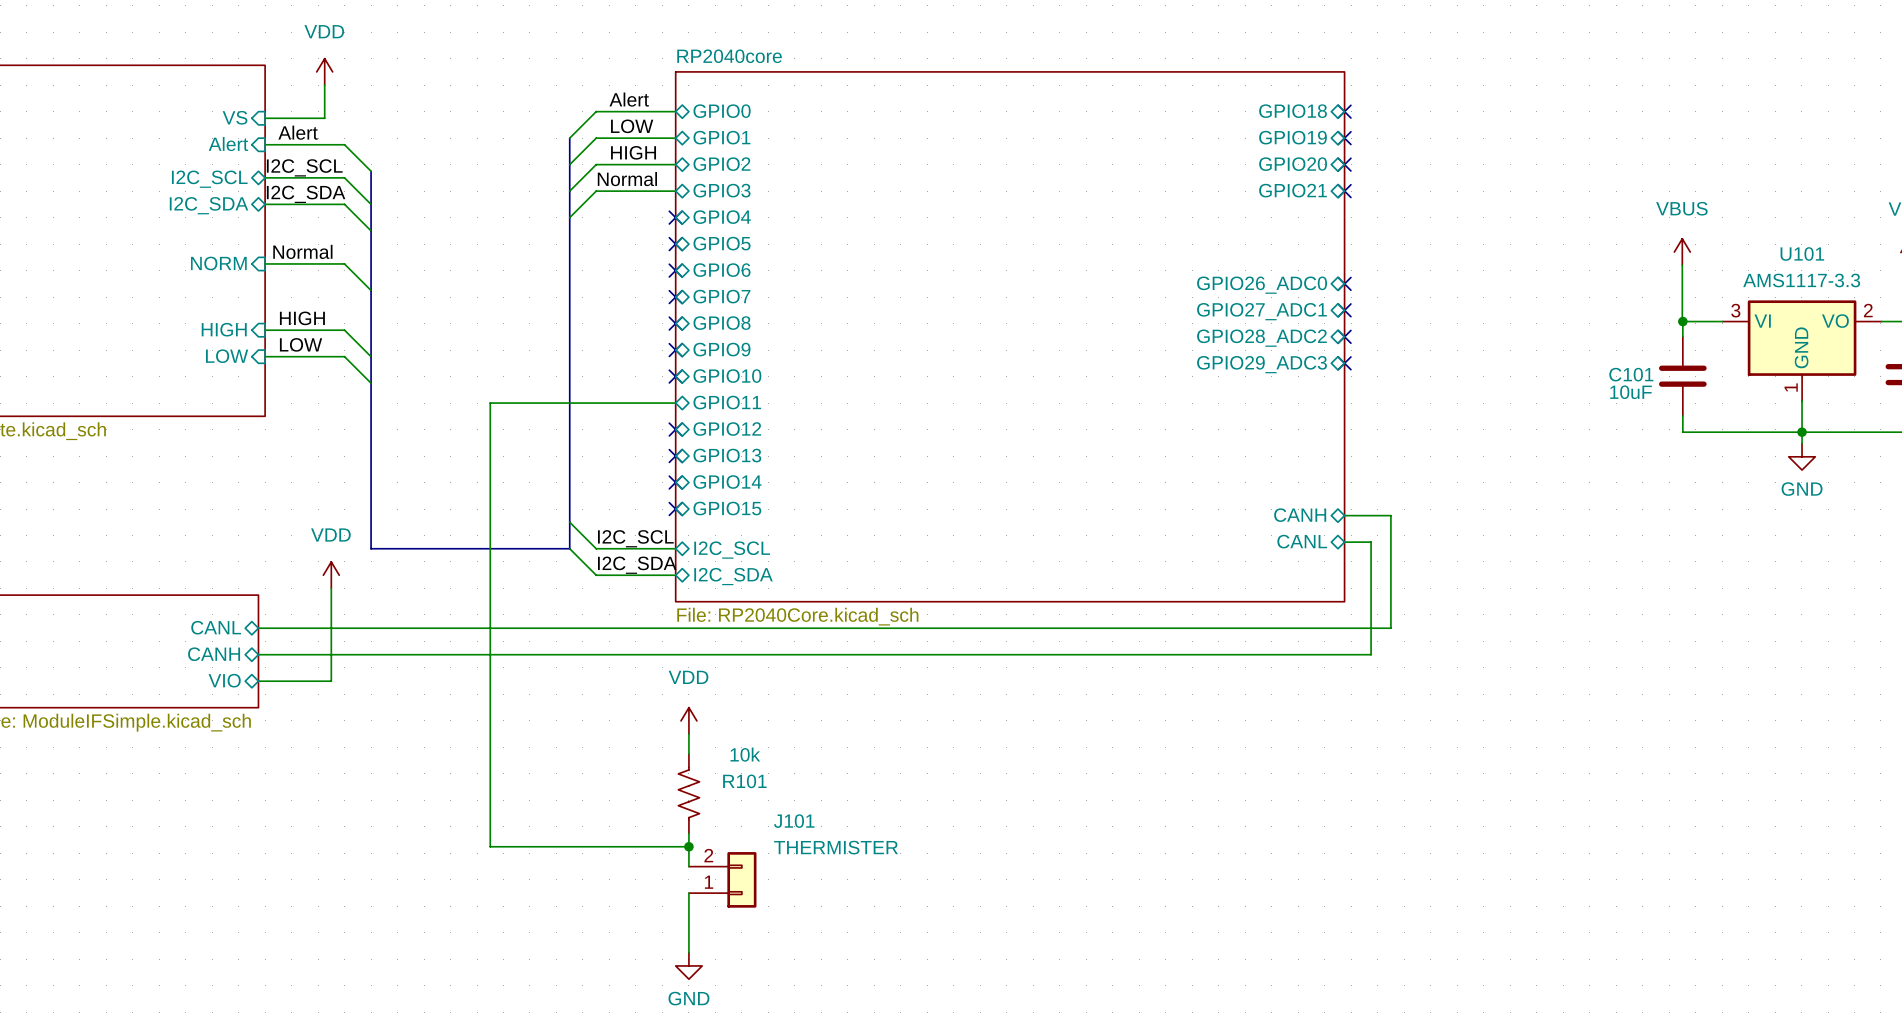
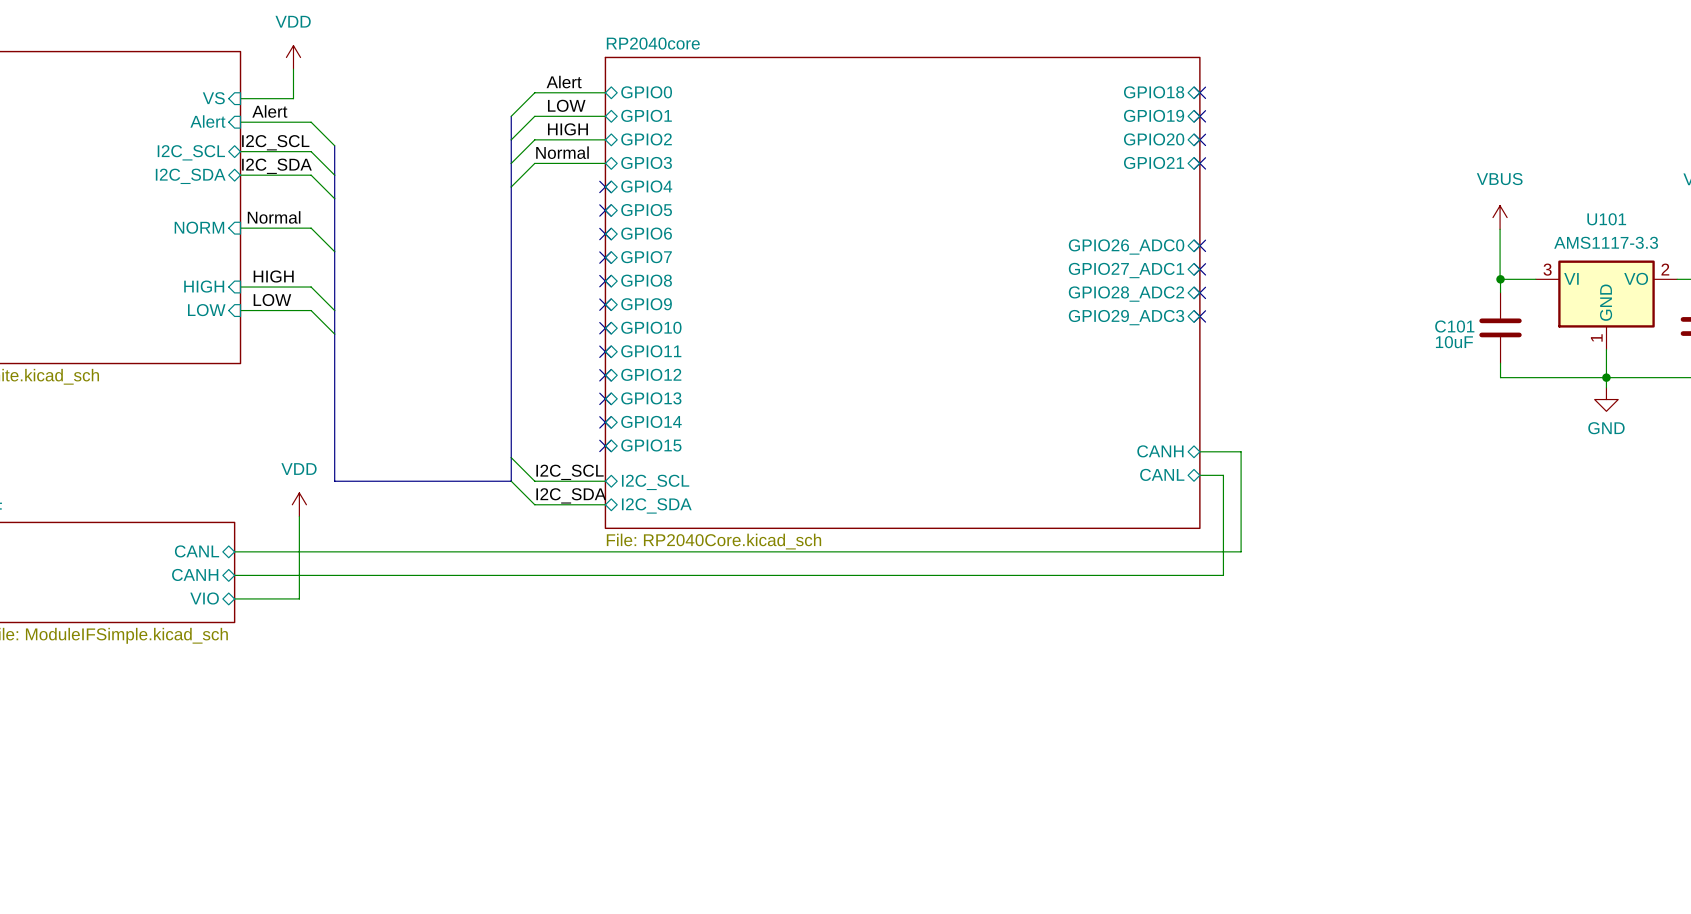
wire: (675, 403) (490, 403) (490, 846) (688, 846) -> none
no-connect mark: none -> (605, 351)
power symbol: VDD (688, 720) -> none
wire: (688, 734) (688, 754) -> none
R101: 10k (688, 793) -> none
wire: (688, 833) (688, 866) -> none
junction: (688, 846) -> none
J101: THERMISTER (722, 879) -> none
wire: (688, 893) (688, 952) -> none
power symbol: GND (688, 965) -> none

